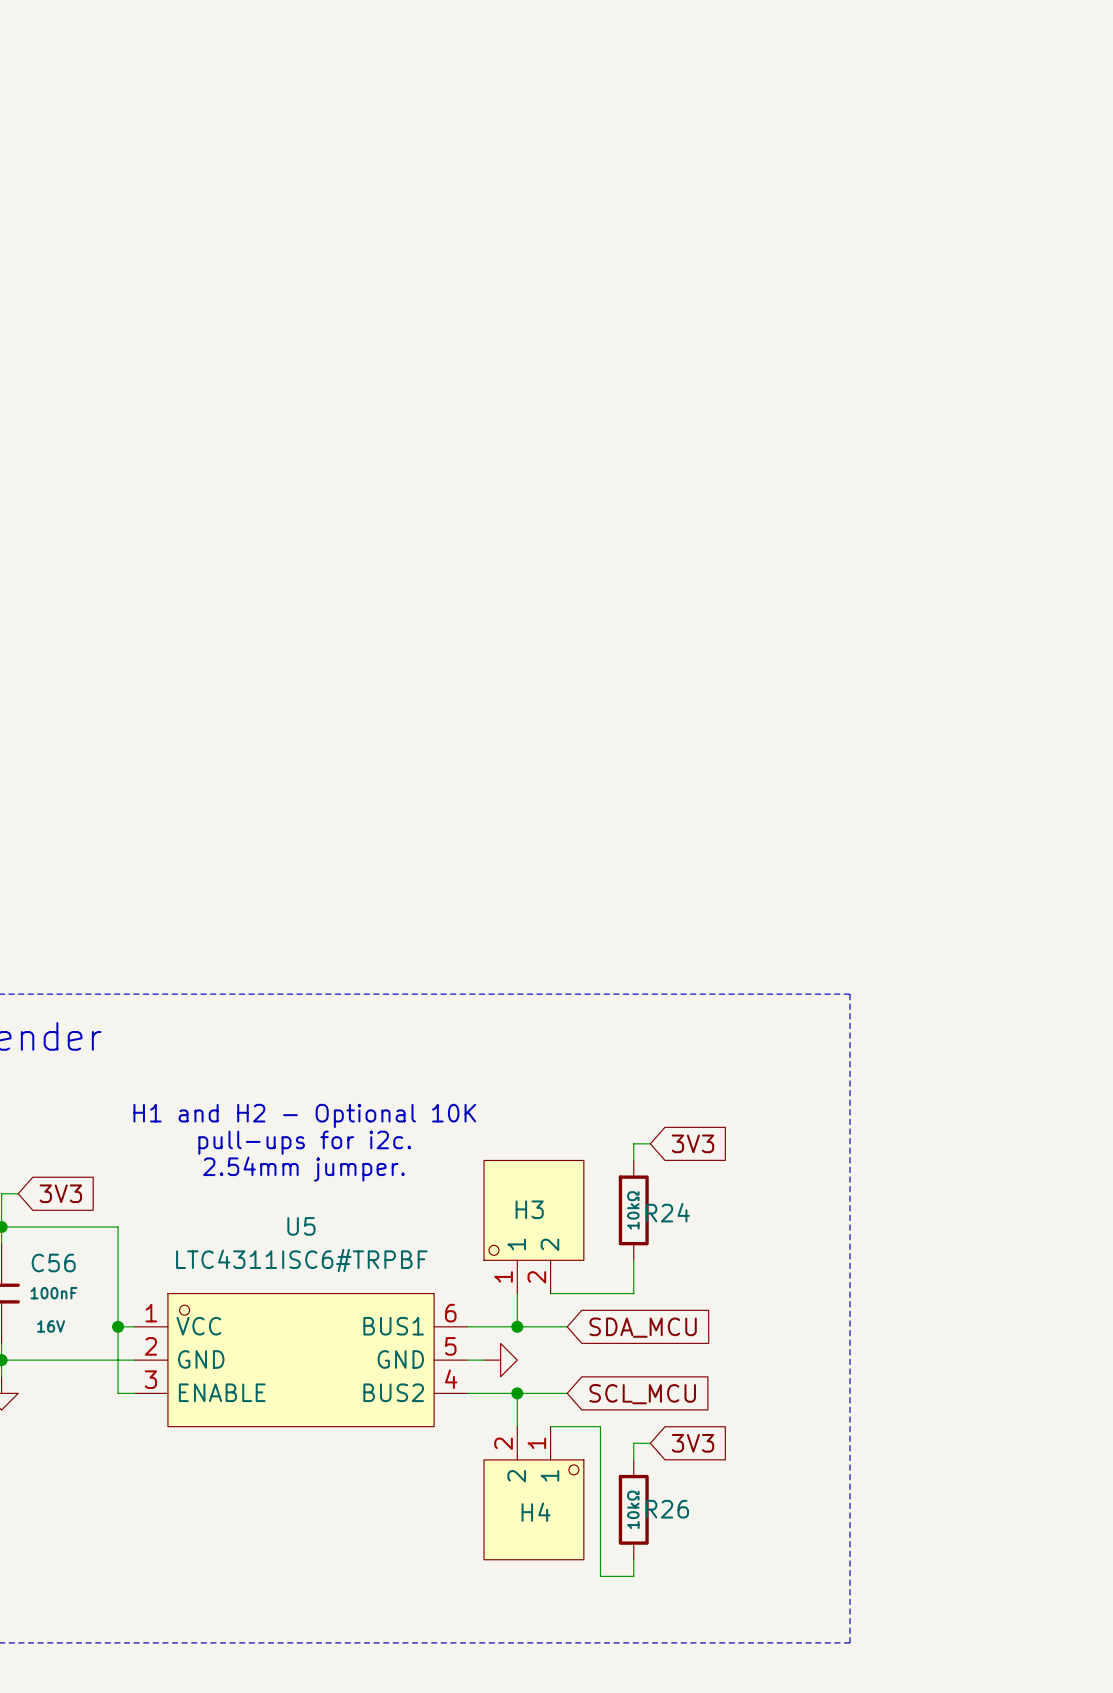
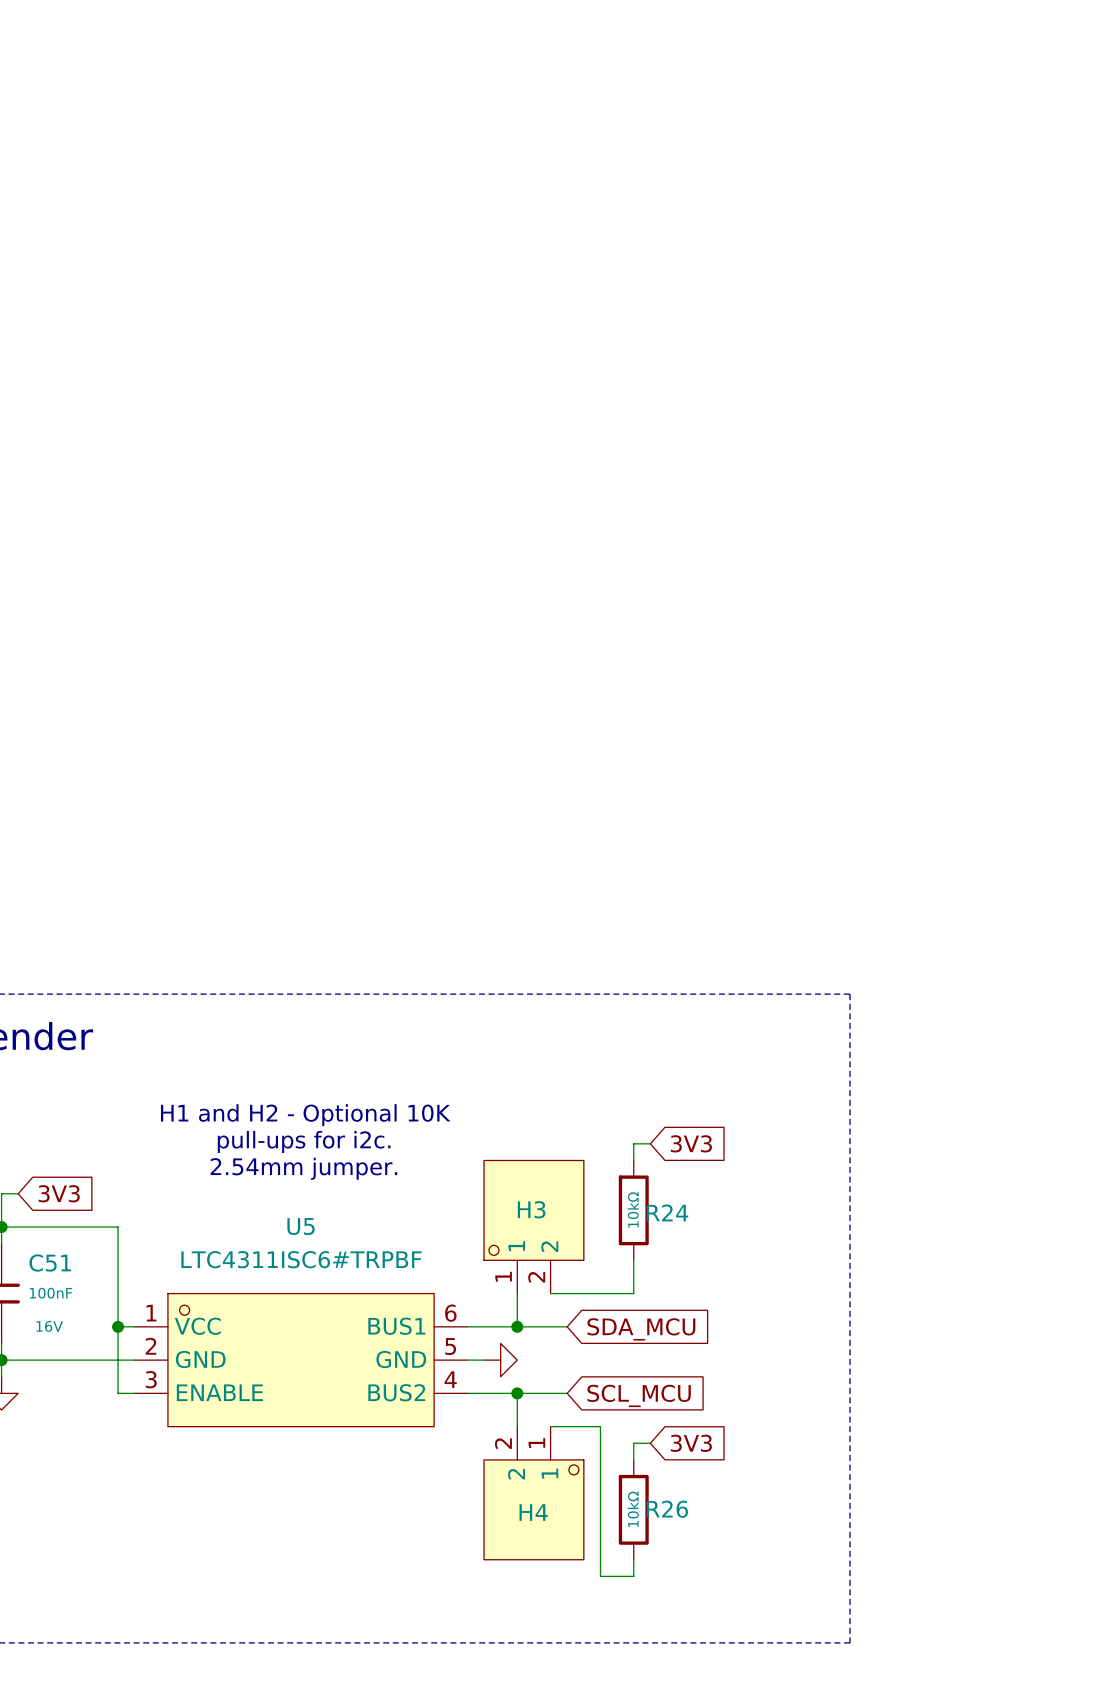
C56 name: C56 (53, 1263) -> C51 (50, 1263)

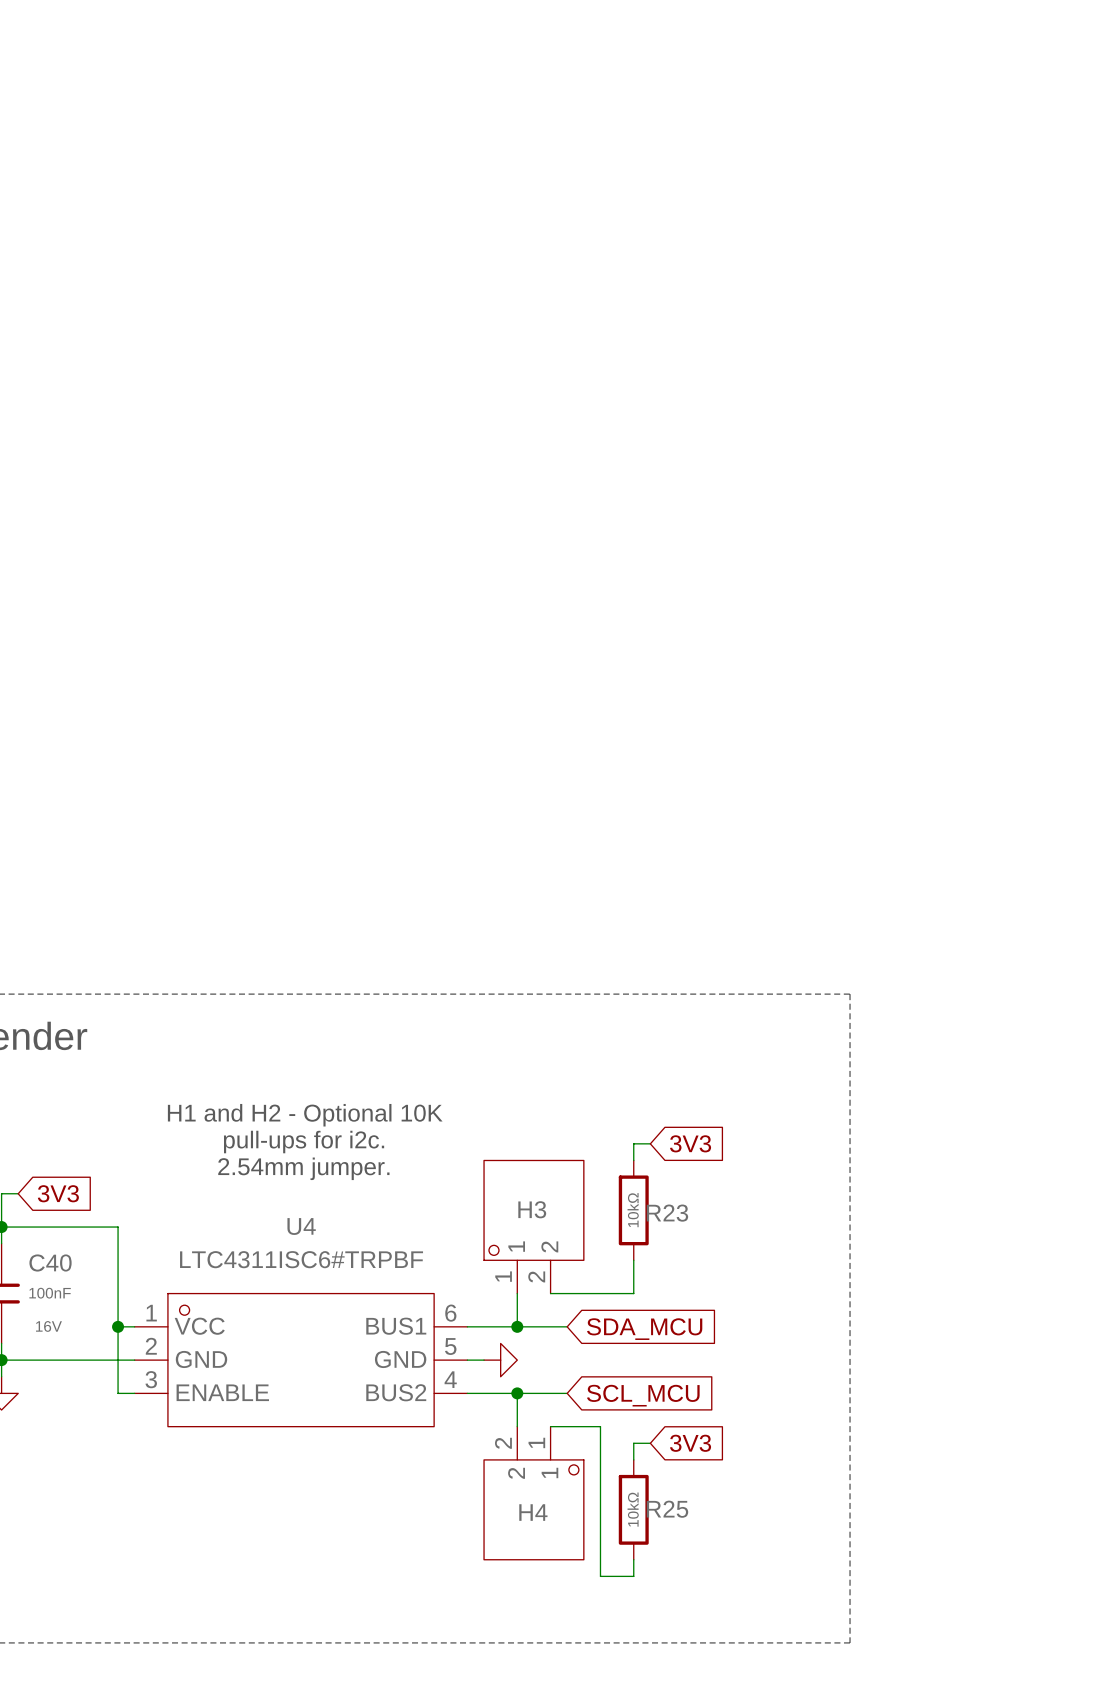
R24 name: R24 (667, 1212) -> R23 (667, 1213)
U5 name: U5 (301, 1226) -> U4 (301, 1226)
C51 name: C51 (50, 1263) -> C40 (50, 1263)
R26 name: R26 (667, 1509) -> R25 (667, 1509)

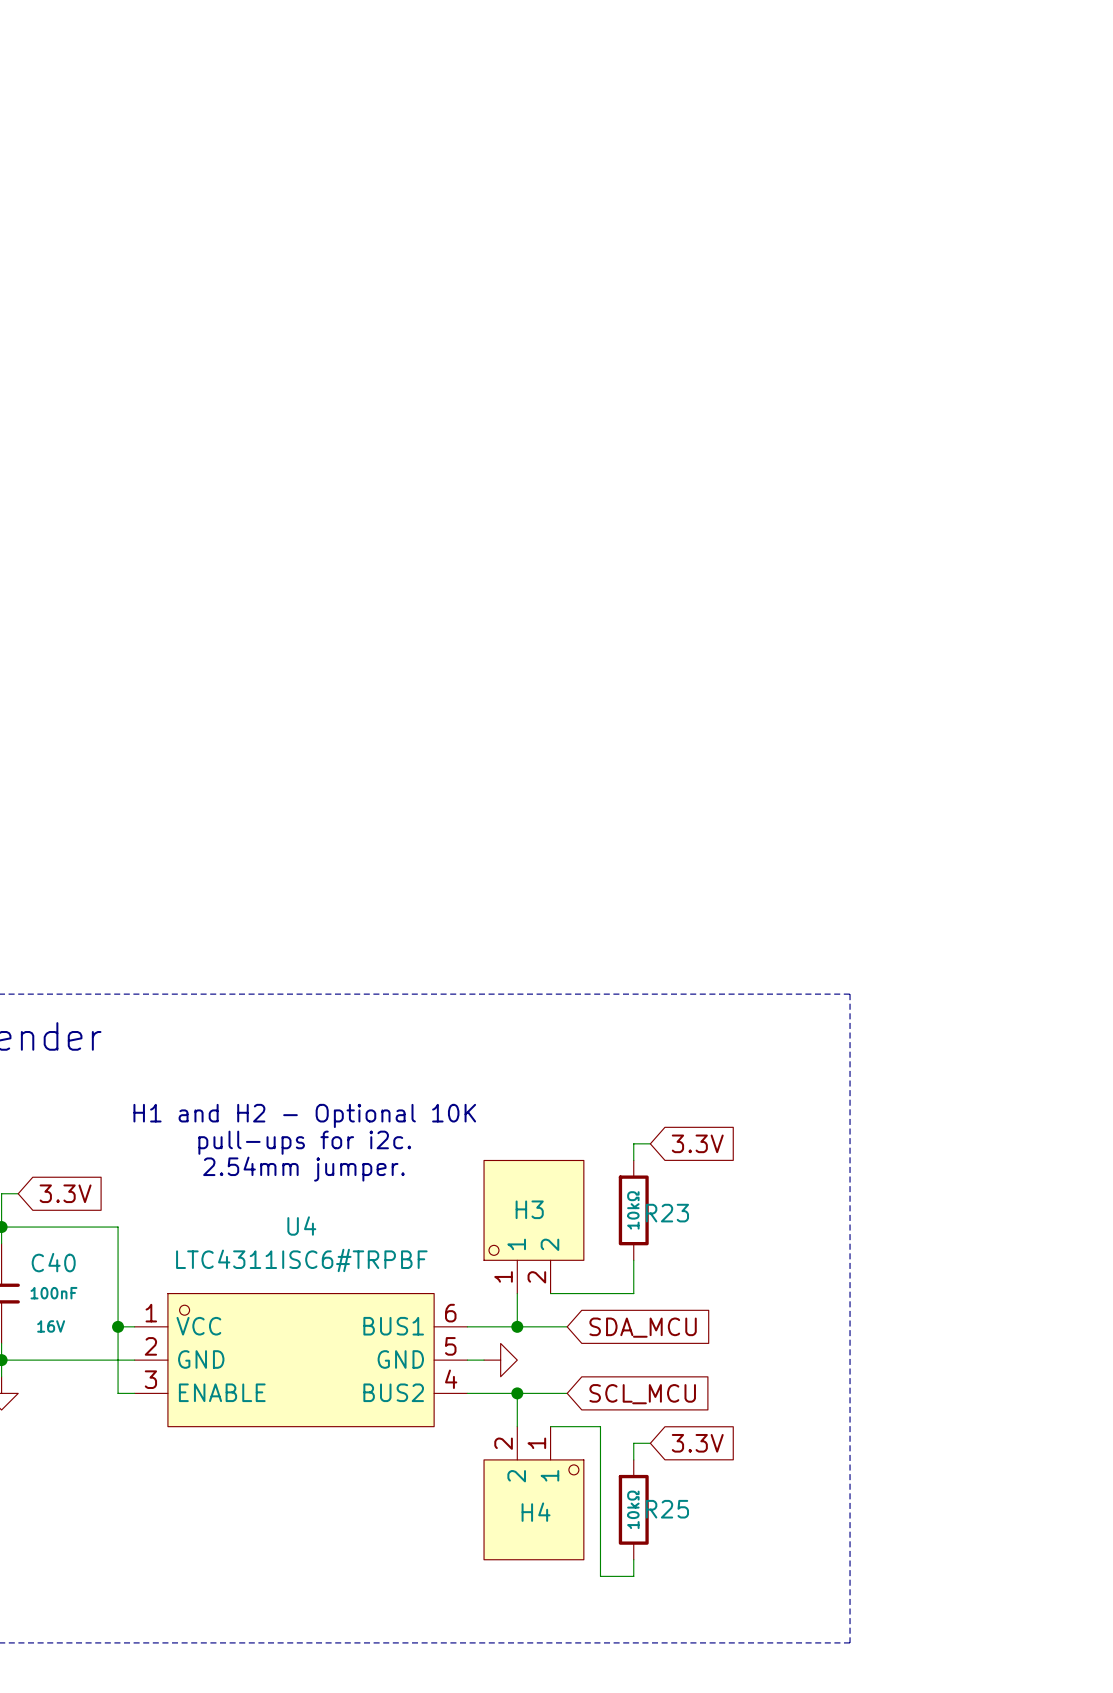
global label: 3V3 (690, 1143) -> 3.3V (697, 1143)
global label: 3V3 (58, 1193) -> 3.3V (65, 1193)
global label: 3V3 (690, 1443) -> 3.3V (697, 1443)

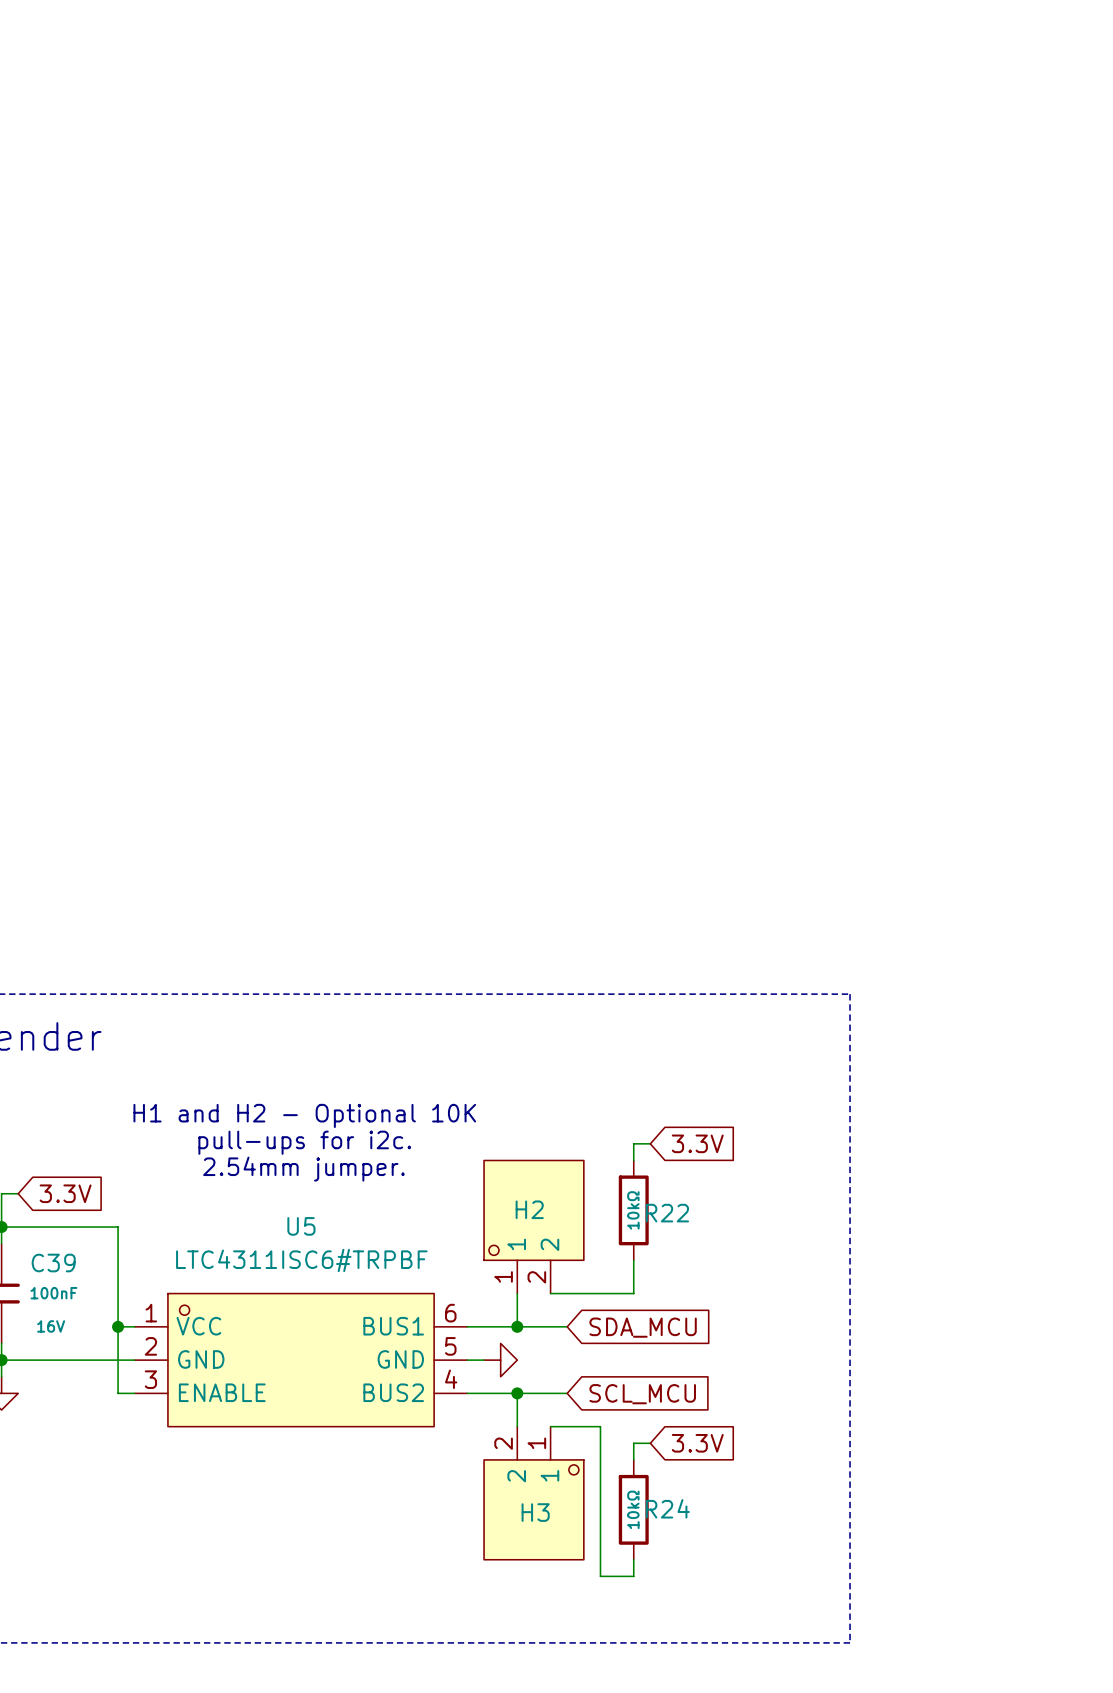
H3 name: H3 (529, 1209) -> H2 (529, 1209)
R23 name: R23 (667, 1213) -> R22 (667, 1213)
U4 name: U4 (301, 1226) -> U5 (301, 1226)
C40 name: C40 (53, 1262) -> C39 (53, 1263)
R25 name: R25 (667, 1509) -> R24 (667, 1508)
H4 name: H4 (536, 1512) -> H3 (535, 1512)

